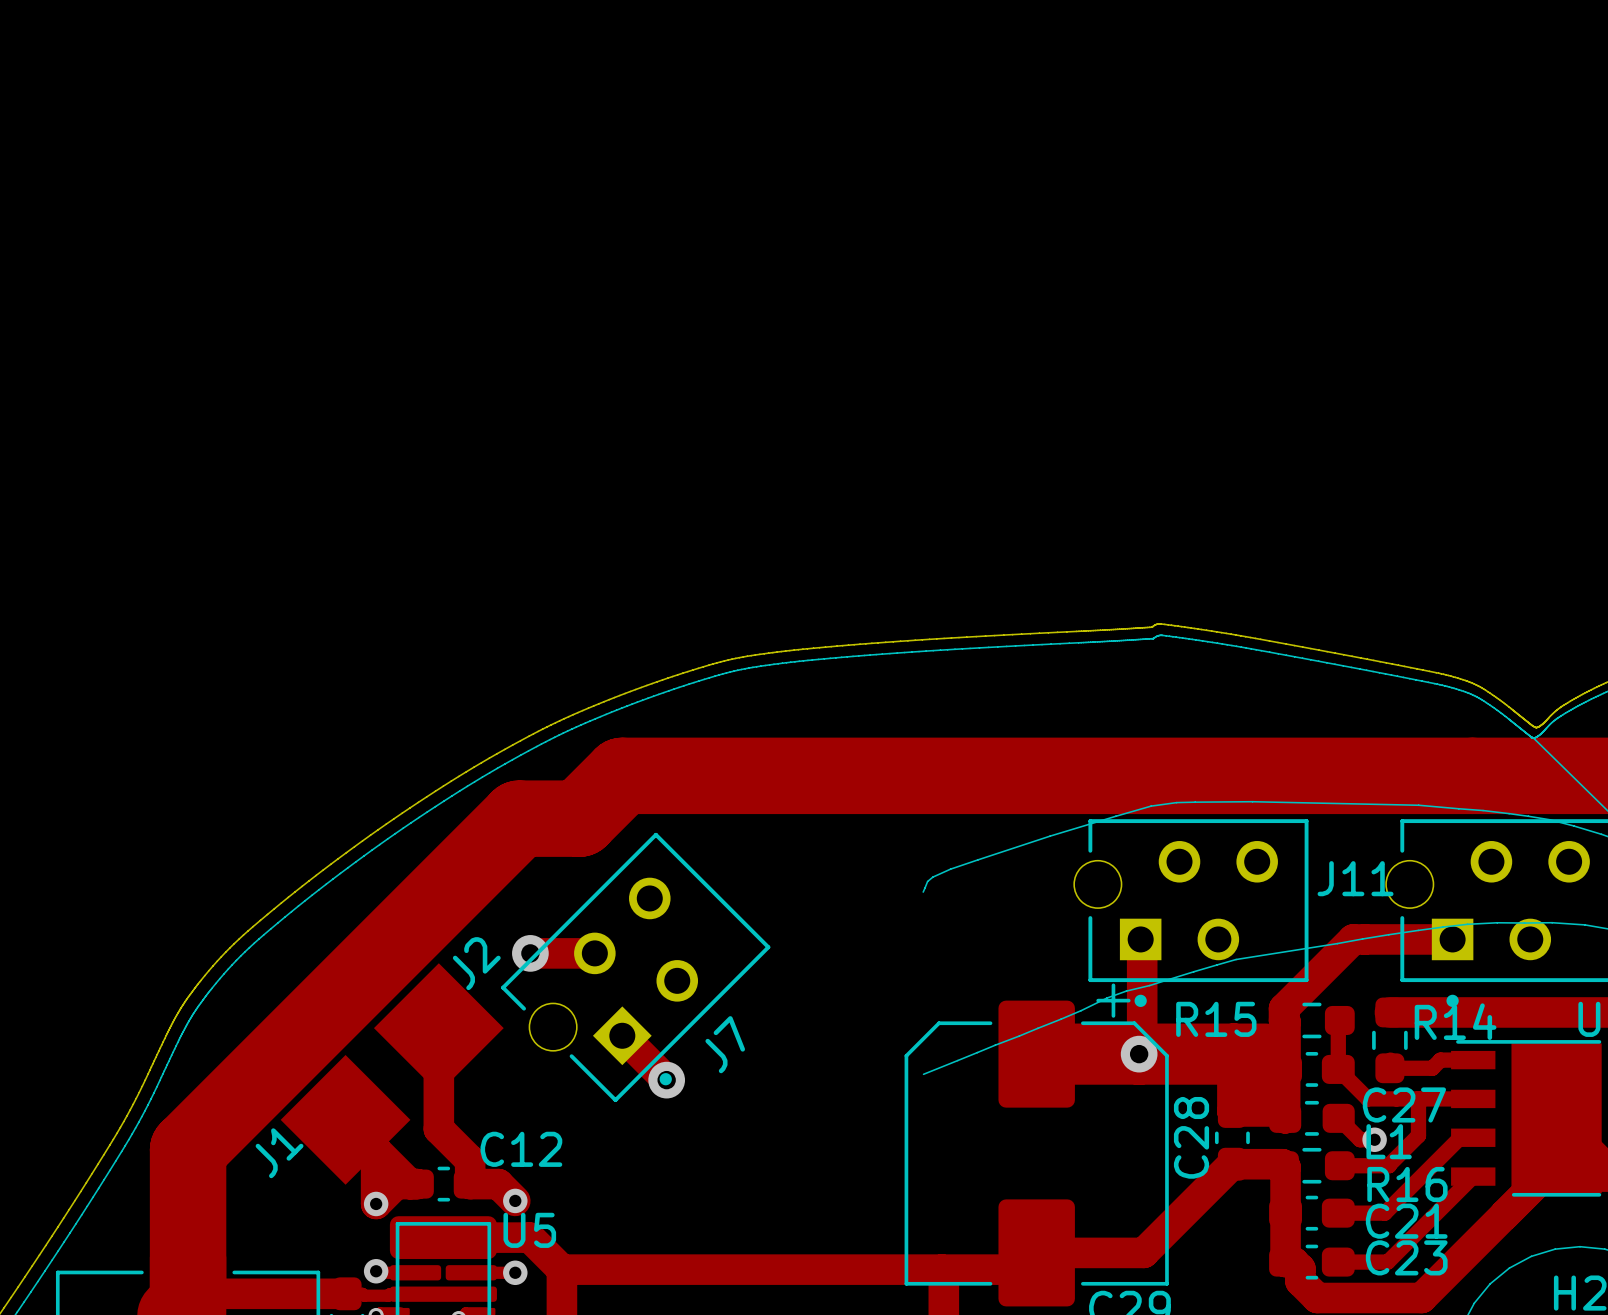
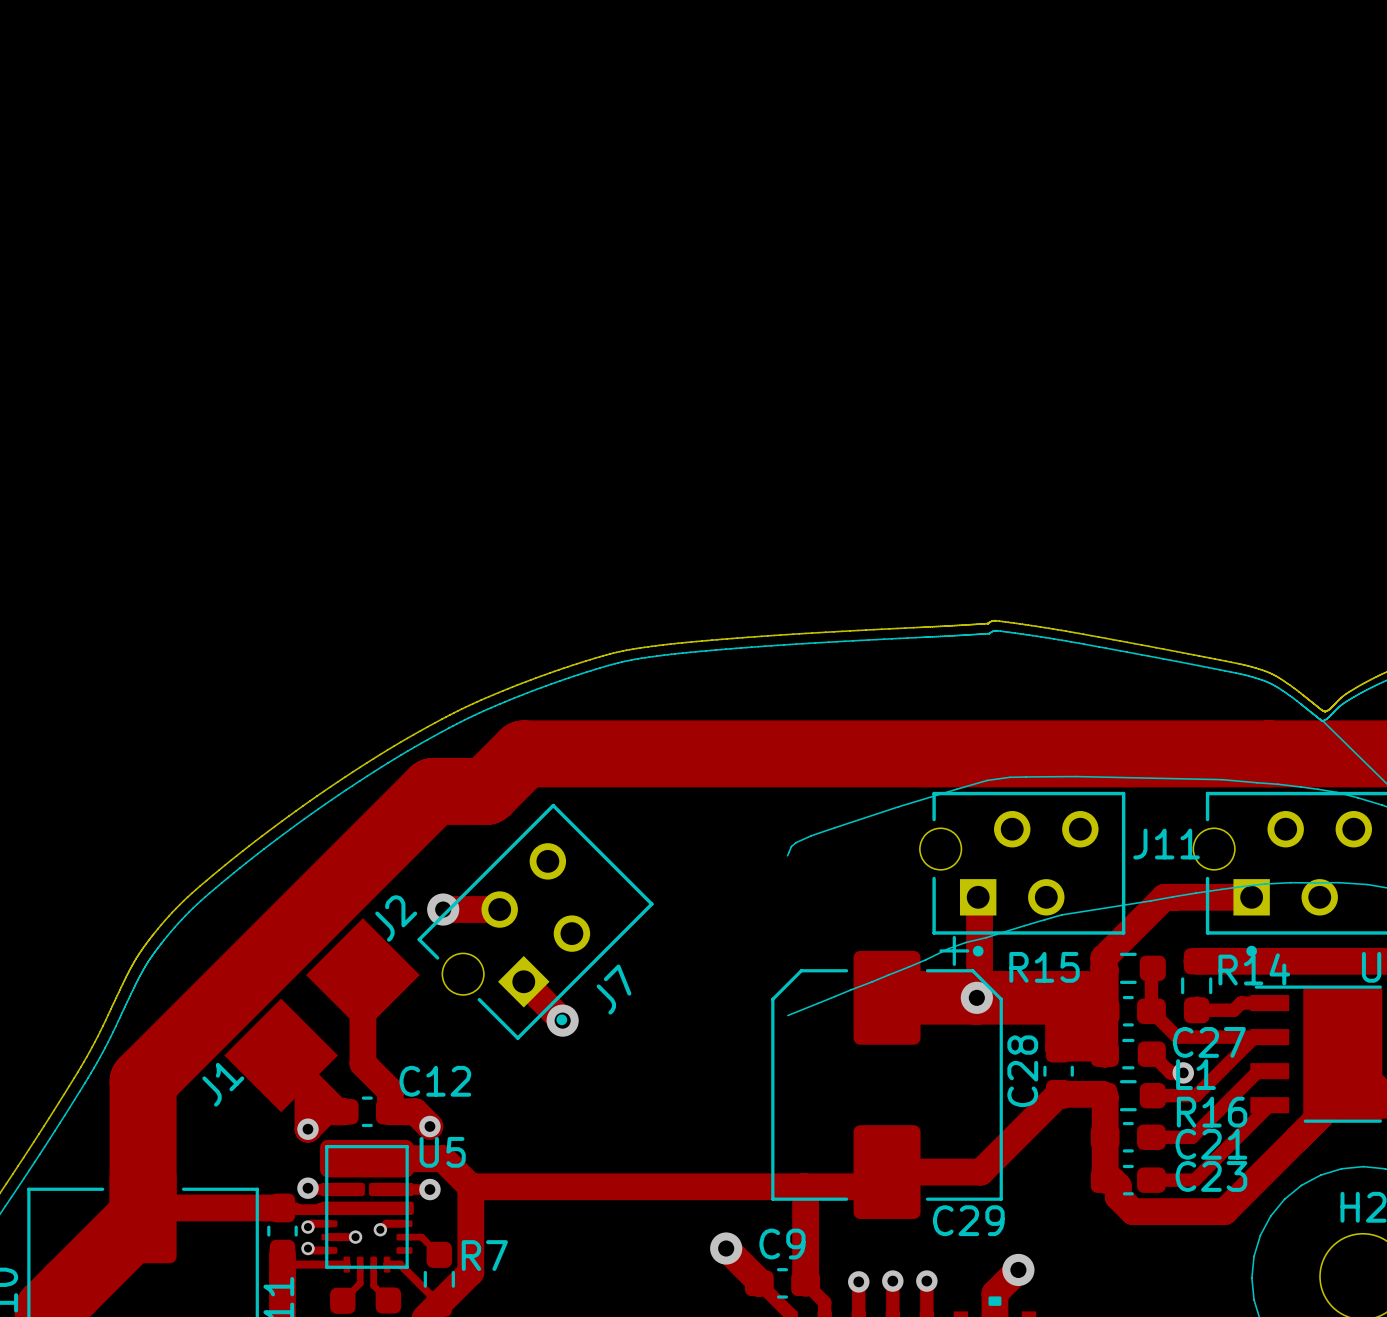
track: (1418, 1098) (1418, 1135) (1389, 1165) -> (1254, 1037) (1196, 1095)

